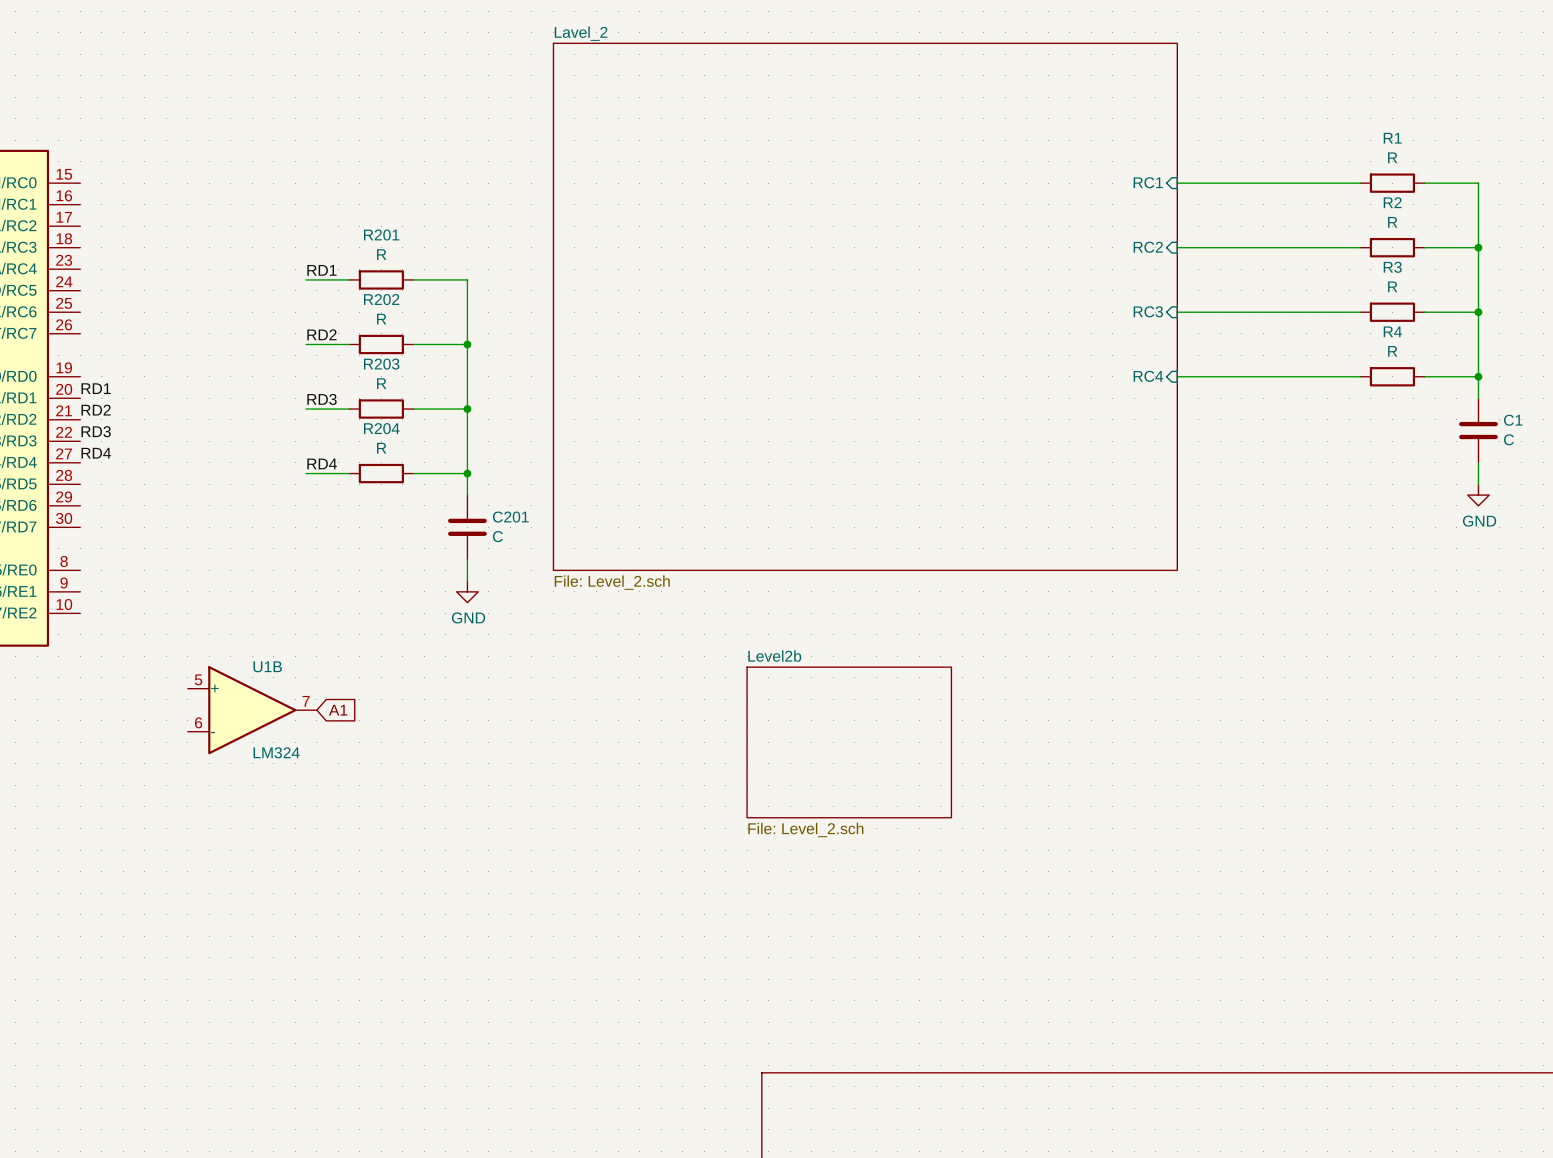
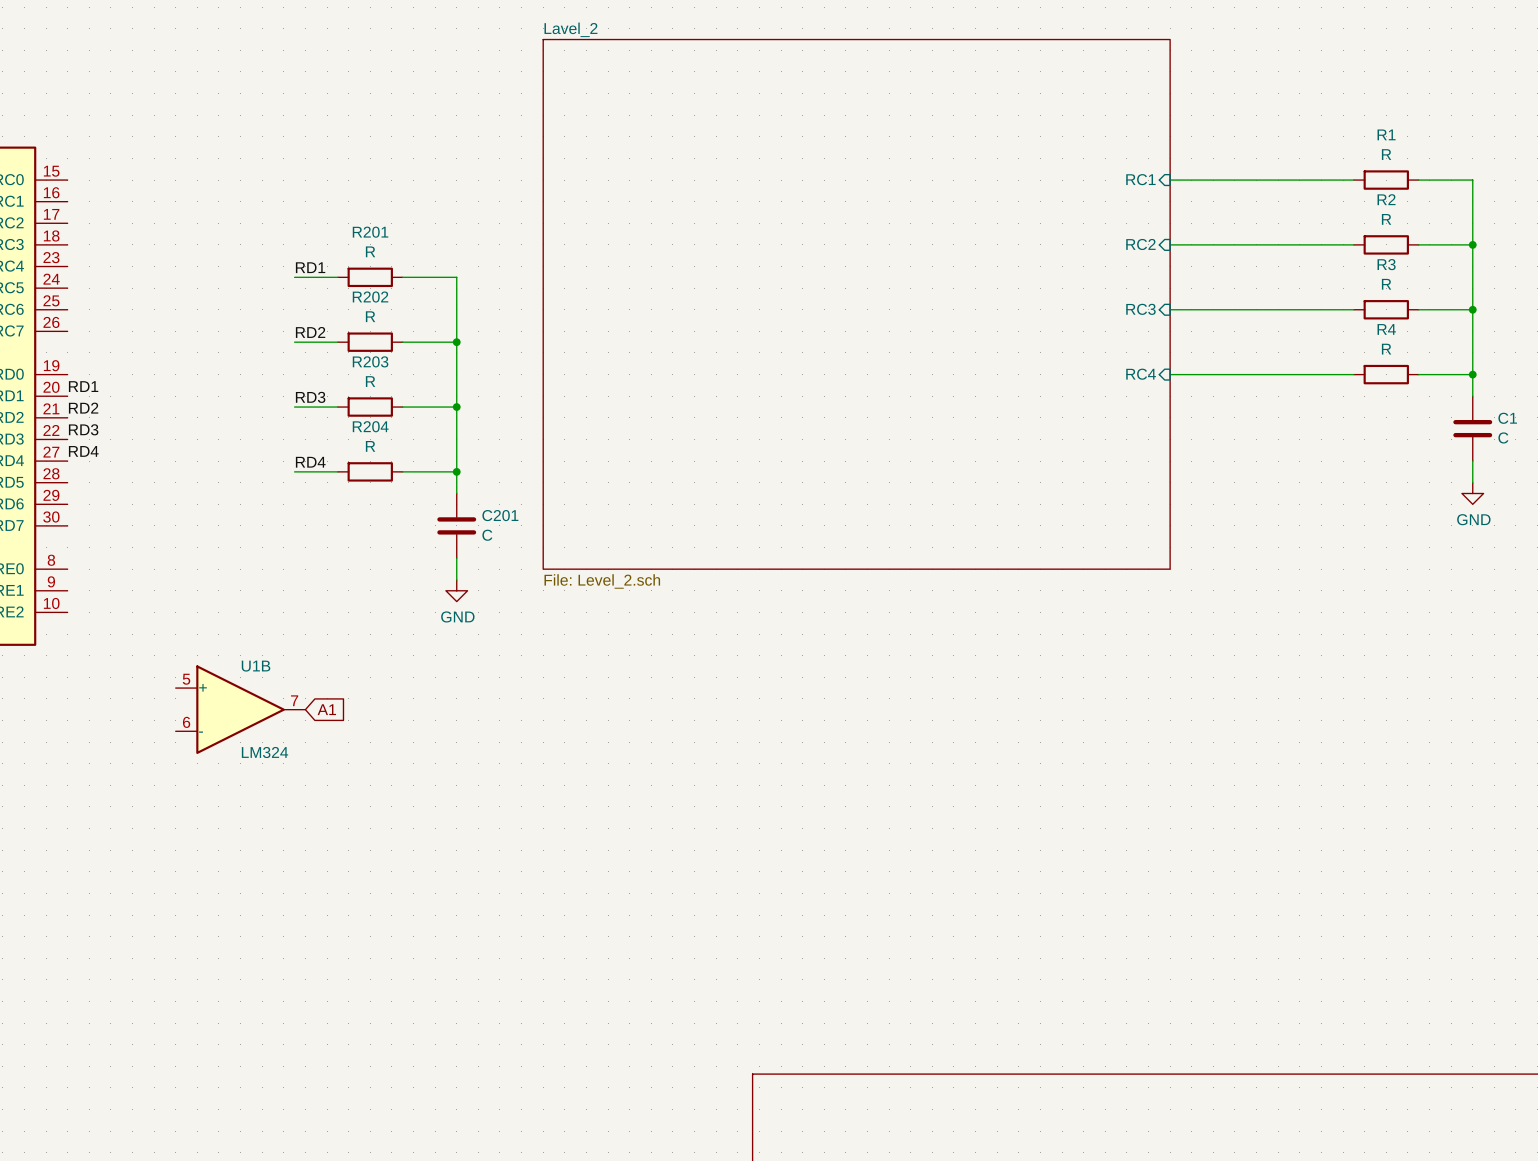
sheet Level2b: File: Level_2.sch (849, 742) -> none

